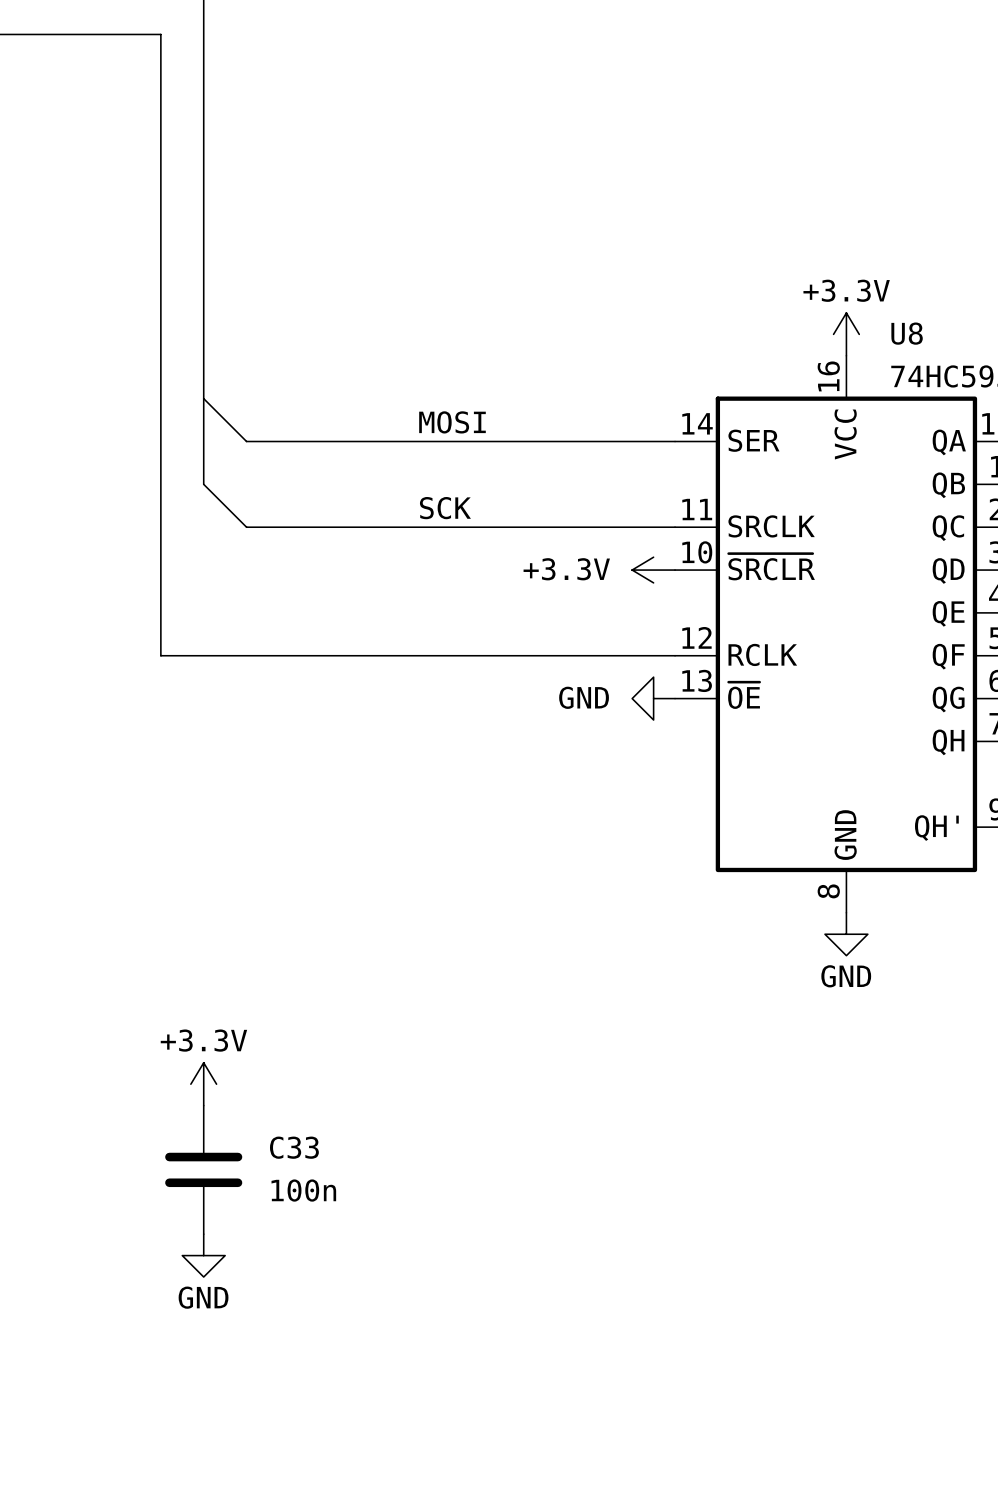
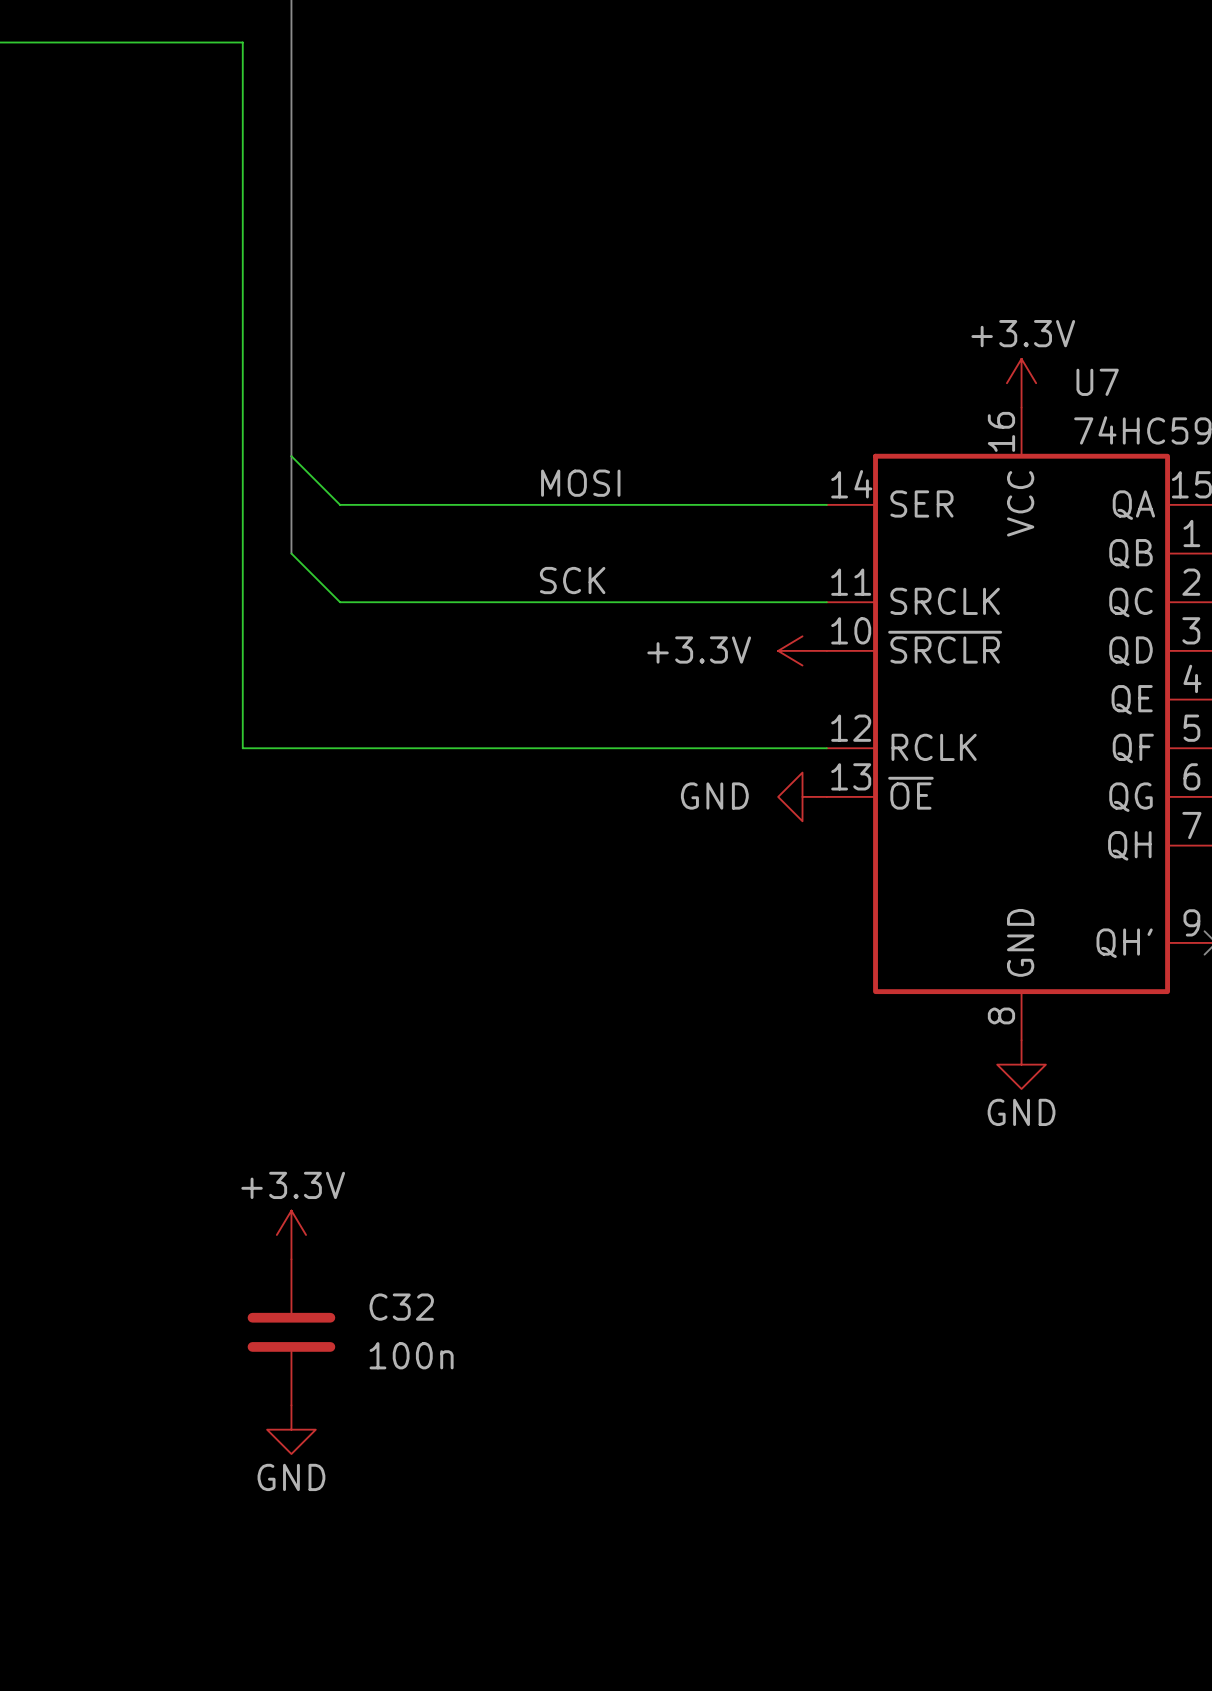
U8 name: U8 (907, 333) -> U7 (1097, 382)
C33 name: C33 (294, 1147) -> C32 (401, 1307)

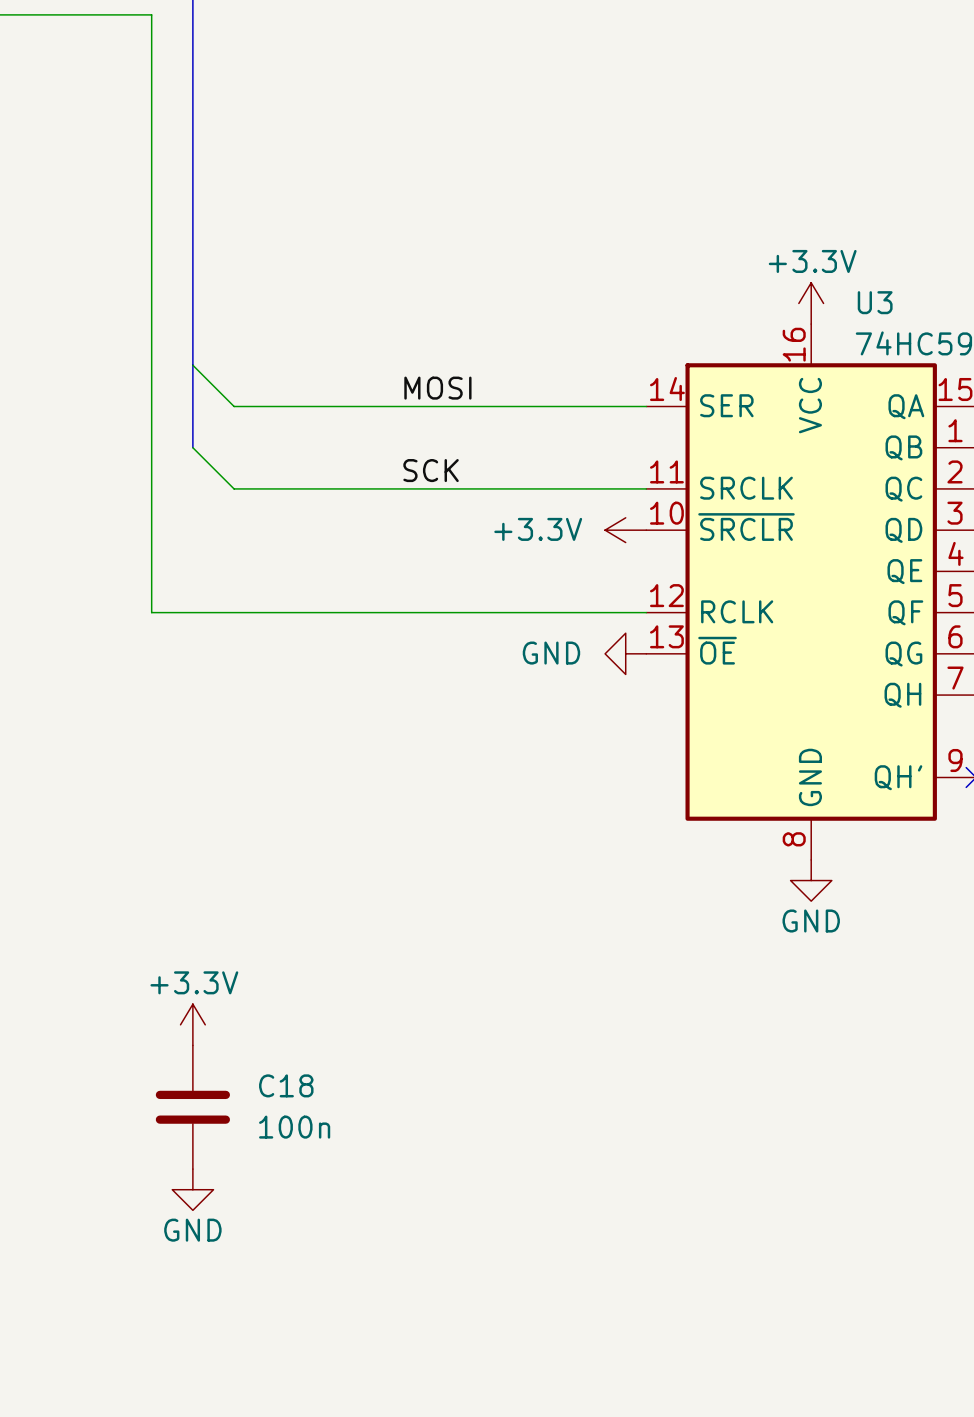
U7 name: U7 (1097, 382) -> U3 (875, 302)
C32 name: C32 (401, 1307) -> C18 (286, 1085)

